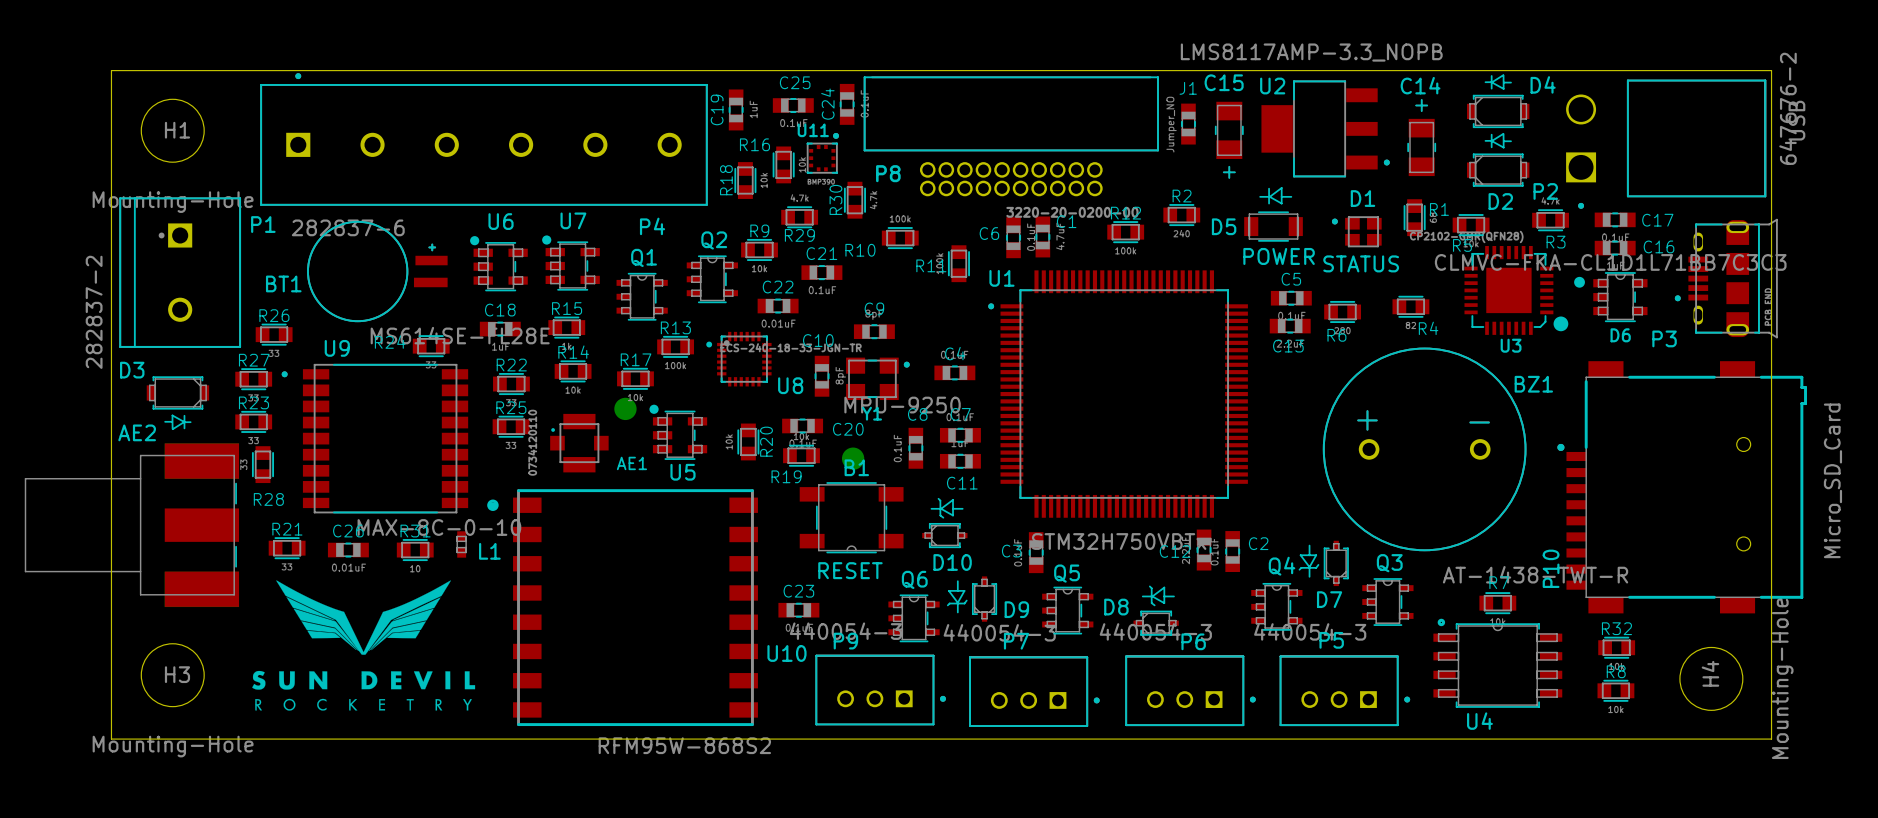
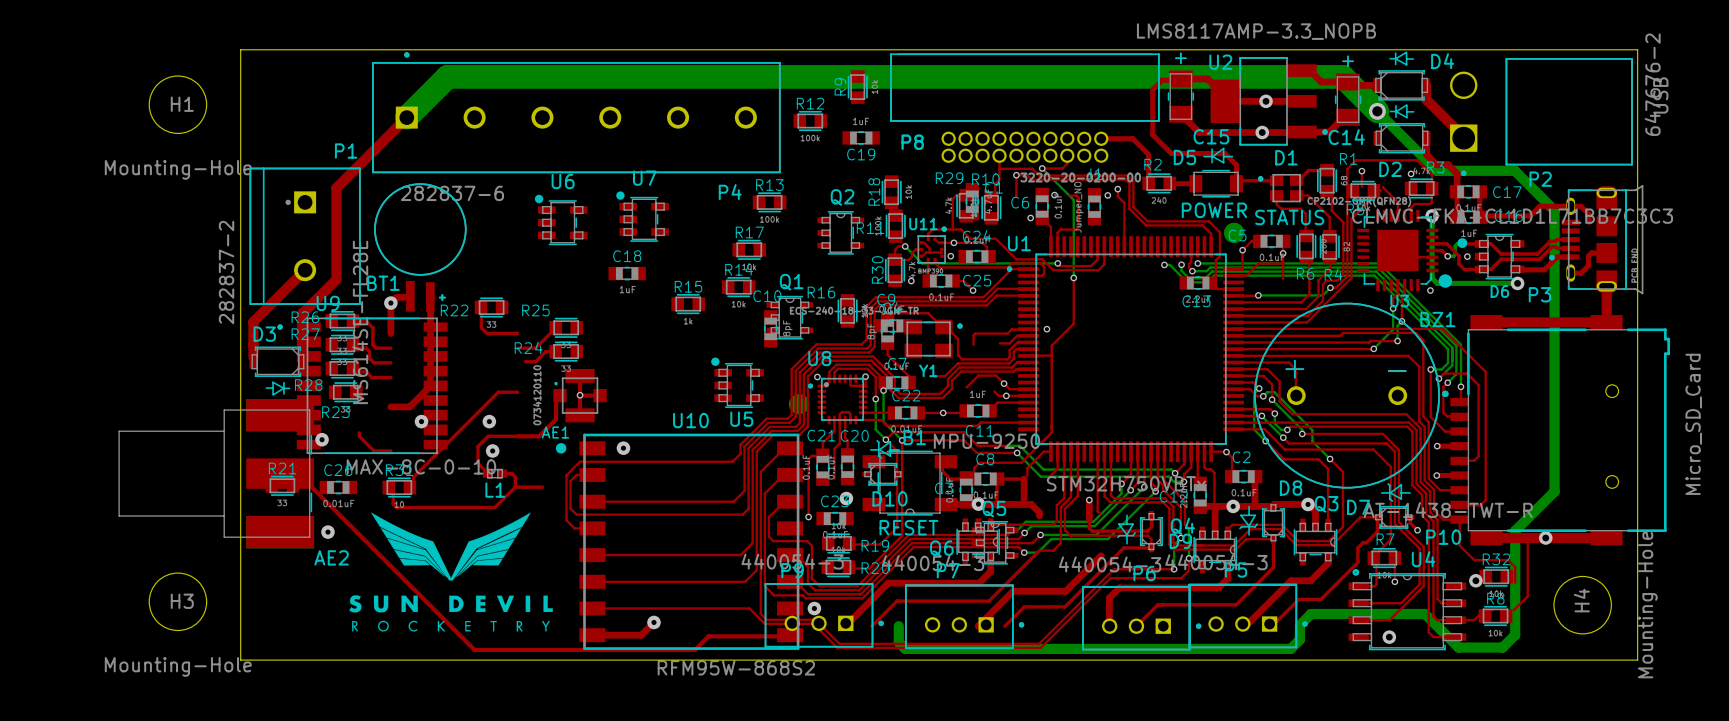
board edge: (241, 70) (111, 70) (111, 739) (241, 739) -> (240, 49) (240, 660)
C25 name position: C25 (795, 82) -> C25 (977, 280)
C14 name position: C14 (1420, 85) -> C14 (1346, 137)
top track: none -> (1312, 72) (1321, 82) (1348, 82)
D4 position: (1498, 101) -> (1401, 76)
top track: none -> (1180, 78) (1207, 78) (1216, 87)
C24 rotation: 0° (847, 104) -> 90° clockwise (977, 256)
C24 position: (847, 104) -> (977, 256)
top track: none -> (1175, 80) (1162, 80) (1152, 89) (1152, 134) (1171, 153) (1224, 153) (1236, 165) (1236, 183)
C25 position: (793, 105) -> (941, 281)
C19 rotation: 0° (736, 109) -> 90° clockwise (861, 137)
C19 position: (736, 109) -> (861, 137)
top track: none -> (1351, 85) (1377, 85)
top track: none -> (1426, 85) (1426, 99) (1461, 134)
J1 position: (1188, 124) -> (1094, 206)
top track: none -> (1229, 99) (1231, 101) (1302, 101)
via: none -> (1266, 101)
U2 position: (1325, 128) -> (1269, 101)
P8 position: (1011, 136) -> (1024, 108)
C14 position: (1421, 137) -> (1348, 90)
via: none -> (1377, 111)
P4 position: (483, 139) -> (576, 112)
C15 rotation: 0° (1229, 140) -> 180° (1180, 87)
C15 position: (1229, 140) -> (1180, 87)
top track: none -> (1180, 114) (1199, 132) (1296, 132)
bottom track: none -> (406, 117) (447, 76) (1342, 76) (1436, 170) (1514, 170) (1554, 210) (1554, 491) (1515, 530) (1515, 635) (1502, 647) (1458, 647) (1425, 613) (1311, 613) (1300, 624)
top track: none -> (403, 120) (336, 187) (336, 279) (302, 313) (302, 360)
top track: none -> (1338, 122) (1329, 132) (1302, 132)
U11 position: (822, 153) -> (932, 245)
D2 position: (1498, 159) -> (1401, 128)
via: none -> (1262, 132)
R16 position: (783, 164) -> (847, 310)
top track: none -> (1101, 138) (1132, 138) (1148, 154) (1148, 183)
top track: none -> (1427, 139) (1426, 154) (1436, 164) (1448, 164) (1457, 173) (1457, 214)
R18 position: (745, 180) -> (891, 192)
top track: none -> (999, 155) (999, 179) (995, 184) (995, 193)
top track: none -> (1067, 155) (1067, 163) (1062, 168) (1042, 168)
P2 name position: P2 (1545, 191) -> P2 (1540, 179)
R2 name position: R2 (1182, 196) -> R2 (1153, 164)
R30 position: (854, 200) -> (895, 270)
top track: none -> (999, 168) (1032, 168) (1039, 175) (1127, 175) (1133, 181) (1133, 207) (1147, 221) (1209, 221) (1219, 232) (1219, 256) (1215, 260) (1215, 287) (1233, 289)
bottom track: none -> (1042, 168) (1073, 199) (1073, 277)
via: none -> (1042, 168)
top track: none -> (1328, 170) (1308, 170) (1296, 180)
top track: none -> (1361, 171) (1361, 186)
via: none -> (1361, 171)
via: none -> (1411, 173)
via: none -> (1016, 175)
R1 name position: R1 (1439, 209) -> R1 (1348, 158)
D5 position: (1273, 214) -> (1216, 172)
top track: none -> (1237, 180) (1276, 180)
R2 position: (1181, 215) -> (1159, 183)
top track: none -> (1170, 182) (1195, 183)
R29 rotation: 0° (799, 217) -> 90° clockwise (966, 205)
R29 position: (799, 217) -> (966, 205)
R1 position: (1414, 217) -> (1327, 180)
C17 position: (1615, 219) -> (1468, 191)
top track: none -> (1383, 186) (1397, 202) (1397, 213)
R3 position: (1550, 220) -> (1421, 188)
top track: none -> (1432, 188) (1432, 175) (1417, 160) (1356, 160) (1347, 169) (1347, 276) (1335, 287) (1330, 287)
top track: none -> (1117, 189) (1117, 196) (1124, 202) (1124, 246)
via: none -> (1117, 189)
P1 name position: P1 (263, 224) -> P1 (346, 151)
top track: none -> (1332, 190) (1331, 210) (1343, 222) (1343, 274) (1337, 280) (1326, 280) (1322, 284) (1322, 300) (1307, 315) (1233, 315)
top track: none -> (1380, 190) (1351, 218) (1351, 277) (1306, 322) (1233, 322)
top track: none -> (1431, 190) (1431, 202) (1430, 204) (1414, 204) (1411, 207) (1411, 215)
D5 name position: D5 (1224, 226) -> D5 (1184, 157)
top track: none -> (1479, 191) (1479, 215)
via: none -> (1054, 195)
top track: none -> (962, 195) (956, 195) (952, 198) (952, 229)
top track: none -> (1016, 195) (1016, 175) (1026, 175) (1031, 179) (1125, 179) (1129, 183) (1129, 208) (1145, 225) (1202, 225) (1211, 233) (1211, 246)
top track: none -> (1069, 195) (1076, 195) (1078, 197) (1078, 226) (1075, 229) (1060, 229) (1057, 232) (1057, 246)
via: none -> (1107, 195)
top track: none -> (1276, 195) (1276, 204) (1281, 208) (1300, 208) (1305, 213) (1305, 236)
top track: none -> (1296, 195) (1307, 195) (1329, 217) (1329, 237)
D1 position: (1356, 231) -> (1280, 188)
R12 position: (1125, 232) -> (810, 120)
R29 name position: R29 (799, 235) -> R29 (949, 178)
C6 position: (1013, 237) -> (1042, 206)
R10 rotation: 0° (900, 238) -> 90° clockwise (991, 207)
R10 position: (900, 238) -> (991, 207)
R3 name position: R3 (1556, 242) -> R3 (1435, 167)
C16 position: (1615, 248) -> (1468, 217)
R9 rotation: 0° (759, 249) -> 90° clockwise (857, 87)
R9 position: (759, 249) -> (857, 87)
bottom track: none -> (1432, 215) (1432, 278) (1437, 283) (1517, 283)
via: none -> (1432, 215)
top track: none -> (1482, 215) (1530, 215) (1539, 206) (1580, 206) (1589, 214) (1589, 222)
via: none -> (1030, 218)
text position: POWER (1279, 256) -> POWER (1214, 210)
top track: none -> (1047, 223) (1050, 227) (1050, 246)
U6 position: (498, 263) -> (561, 220)
U7 position: (570, 263) -> (642, 216)
text position: STATUS (1361, 263) -> STATUS (1289, 217)
BT1 rotation: 0° (377, 271) -> 90° clockwise (420, 247)
part: none -> (1234, 232)
P1 position: (180, 272) -> (305, 236)
C21 rotation: 0° (821, 272) -> 90° clockwise (822, 467)
C21 position: (821, 272) -> (822, 467)
top track: none -> (928, 239) (928, 233) (932, 229) (961, 229) (970, 238) (995, 238) (1016, 259) (1042, 259) (1053, 270) (1098, 270) (1104, 264) (1104, 246)
top track: none -> (1570, 239) (1550, 241) (1537, 253) (1501, 253) (1491, 243) (1463, 243)
Q2 position: (712, 279) -> (840, 232)
top track: none -> (936, 240) (938, 242) (982, 242) (986, 247) (986, 253)
C5 name position: C5 (1291, 279) -> C5 (1237, 235)
top track: none -> (1260, 241) (1251, 241) (1242, 250) (1242, 269)
top track: none -> (1283, 241) (1283, 278)
top track: none -> (921, 242) (929, 248) (929, 252)
via: none -> (953, 242)
BT1 name position: BT1 (283, 283) -> BT1 (383, 283)
top track: none -> (1432, 243) (1446, 243) (1458, 255) (1458, 264) (1464, 269) (1481, 269)
bottom track: none -> (1463, 243) (1457, 243) (1455, 246) (1455, 254) (1447, 256)
top track: none -> (905, 246) (898, 246) (895, 249) (895, 263)
bottom track: none -> (905, 246) (922, 263) (1057, 263)
via: none -> (905, 246)
top track: none -> (1097, 246) (1097, 259) (1091, 266) (1060, 266) (1057, 263)
top track: none -> (1191, 246) (1191, 261) (1189, 267) (1192, 271)
top track: none -> (1570, 248) (1552, 246) (1539, 259) (1501, 259) (1491, 269) (1481, 269)
top track: none -> (921, 249) (915, 249) (908, 260) (895, 260)
via: none -> (1242, 250)
top track: none -> (1432, 250) (1441, 250) (1447, 256)
top track: none -> (941, 252) (926, 252) (921, 256)
via: none -> (1283, 253)
top track: none -> (1606, 253) (1591, 253) (1588, 256) (1588, 265) (1580, 273) (1572, 273)
Q1 position: (642, 296) -> (789, 317)
via: none -> (950, 256)
via: none -> (1447, 256)
top track: none -> (1413, 256) (1432, 257)
via: none -> (1467, 256)
top track: none -> (1570, 257) (1557, 257) (1544, 269) (1520, 269)
C5 position: (1291, 298) -> (1271, 241)
top track: none -> (1309, 258) (1309, 294) (1301, 302) (1233, 302)
top track: none -> (1330, 258) (1330, 268) (1318, 280) (1318, 296) (1306, 309) (1233, 309)
top track: none -> (928, 259) (929, 281)
top track: none -> (935, 259) (935, 263) (939, 267) (1007, 267) (1011, 263) (1040, 263) (1044, 266) (1044, 273) (1042, 275) (1028, 275)
via: none -> (1057, 263)
bottom track: none -> (1197, 263) (1379, 263) (1460, 344) (1460, 386)
via: none -> (1197, 263)
top track: none -> (1283, 263) (1258, 263) (1246, 275) (1233, 275)
C22 position: (778, 306) -> (906, 412)
bottom track: none -> (1164, 264) (1169, 264) (1187, 282) (1207, 282) (1214, 275) (1374, 275) (1448, 349) (1448, 363) (1441, 369) (1430, 369)
via: none -> (1164, 264)
bottom track: none -> (1181, 264) (1181, 270) (1189, 278) (1205, 278) (1212, 271) (1376, 271) (1452, 347) (1452, 365) (1438, 378)
via: none -> (1181, 264)
R4 rotation: 0° (1410, 306) -> 90° clockwise (1329, 246)
R4 position: (1410, 306) -> (1329, 246)
top track: none -> (1028, 269) (1011, 269) (983, 297) (875, 297) (866, 306) (866, 339) (861, 344) (816, 344) (791, 369) (791, 414) (787, 418) (766, 418) (740, 444) (740, 453) (732, 461) (580, 461) (566, 475) (566, 520) (574, 528) (592, 528)
top track: none -> (305, 270) (253, 321) (253, 357)
R6 rotation: 0° (1342, 311) -> 90° clockwise (1306, 246)
R6 position: (1342, 311) -> (1306, 246)
bottom track: none -> (1192, 271) (1206, 271) (1210, 267) (1377, 267) (1456, 345) (1456, 374) (1447, 382)
via: none -> (1192, 271)
R26 name position: R26 (274, 315) -> R26 (305, 317)
top track: none -> (1073, 277) (1073, 323) (1051, 345) (1051, 432) (1021, 462) (979, 462) (974, 468) (974, 479) (950, 479) (942, 470) (942, 462)
via: none -> (1073, 277)
via: none -> (911, 281)
top track: none -> (952, 281) (963, 281) (973, 290)
via: none -> (1517, 283)
R15 position: (566, 327) -> (688, 304)
top track: none -> (1397, 285) (1397, 293) (1393, 298) (1393, 308)
top track: none -> (1404, 285) (1404, 295) (1401, 298) (1401, 321)
C18 position: (500, 329) -> (627, 273)
top track: none -> (1606, 286) (1606, 322) (1604, 324)
C9 rotation: 0° (874, 331) -> 90° clockwise (887, 331)
C9 position: (874, 331) -> (887, 331)
bottom track: none -> (1330, 287) (1322, 295) (1258, 295)
via: none -> (1330, 287)
top track: none -> (1023, 288) (997, 288) (985, 301) (877, 301) (870, 308) (870, 345) (867, 348) (818, 348) (795, 370) (795, 416) (789, 422) (768, 422) (744, 446) (744, 490) (733, 501) (592, 501)
R26 position: (274, 334) -> (342, 321)
via: none -> (973, 290)
via: none -> (1430, 290)
top track: none -> (1024, 295) (996, 295) (986, 305) (879, 305) (874, 309) (874, 346) (868, 352) (819, 352) (799, 372) (799, 423) (796, 426) (769, 426) (748, 448) (748, 508) (742, 514) (576, 514) (570, 508) (570, 481) (576, 475) (592, 475)
top track: none -> (1258, 295) (1233, 295)
via: none -> (1258, 295)
top track: none -> (410, 297) (396, 297) (390, 303) (390, 333)
top track: none -> (430, 297) (430, 386) (409, 406) (390, 406)
R24 position: (431, 346) -> (566, 351)
R13 position: (675, 346) -> (769, 202)
via: none -> (390, 303)
bottom track: none -> (1393, 308) (1393, 329) (1373, 348)
via: none -> (1393, 308)
top track: none -> (481, 310) (481, 327) (487, 333) (517, 333)
U8 position: (738, 359) -> (837, 399)
R27 name position: R27 (254, 360) -> R27 (305, 334)
R22 name position: R22 (511, 365) -> R22 (454, 310)
top track: none -> (887, 319) (894, 313) (928, 313) (958, 339) (958, 355) (962, 359) (1007, 359) (1009, 357) (1009, 350) (1017, 342) (1028, 342)
top track: none -> (355, 321) (366, 321) (372, 327) (372, 344) (376, 348) (390, 348)
bottom track: none -> (1401, 321) (1397, 325) (1397, 341)
via: none -> (1401, 321)
top track: none -> (1606, 322) (1486, 322)
D3 name position: D3 (132, 370) -> D3 (264, 334)
R14 position: (573, 371) -> (738, 287)
top track: none -> (1020, 329) (1011, 329) (1007, 333) (975, 333) (973, 335) (973, 344)
via: none -> (1046, 329)
top track: none -> (1442, 328) (1485, 371) (1485, 500) (1480, 505) (1464, 505)
top track: none -> (1442, 328) (1233, 329)
top track: none -> (552, 331) (535, 348) (517, 348)
R17 position: (635, 378) -> (749, 249)
Y1 position: (877, 378) -> (933, 339)
R27 position: (253, 379) -> (342, 344)
top track: none -> (1028, 335) (1017, 335) (1009, 343) (999, 343)
top track: none -> (1233, 335) (1340, 335) (1343, 332) (1415, 332) (1423, 340) (1423, 416) (1428, 422) (1428, 478) (1440, 490) (1459, 490)
R22 position: (511, 384) -> (491, 307)
BZ1 name position: BZ1 (1533, 384) -> BZ1 (1437, 319)
U8 name position: U8 (790, 385) -> U8 (819, 358)
top track: none -> (1397, 341) (1233, 342)
via: none -> (1397, 341)
top track: none -> (887, 342) (887, 354) (909, 376)
U1 position: (1118, 394) -> (1125, 349)
top track: none -> (355, 348) (366, 348) (369, 351) (369, 358) (374, 362) (390, 362)
top track: none -> (1028, 349) (1016, 349) (1013, 351) (1013, 359) (1009, 363) (957, 363) (944, 376) (934, 376)
top track: none -> (1373, 348) (1233, 349)
via: none -> (1373, 348)
top track: none -> (555, 351) (545, 351) (535, 361) (525, 361)
R23 name position: R23 (253, 402) -> R23 (335, 412)
D3 position: (177, 403) -> (277, 371)
top track: none -> (1051, 354) (1032, 355)
top track: none -> (1233, 355) (1408, 355) (1419, 366) (1419, 421) (1424, 426) (1424, 480) (1434, 489) (1434, 510) (1443, 519) (1459, 519) (1459, 545) (1474, 560) (1508, 560) (1515, 567) (1515, 582)
R25 name position: R25 (511, 407) -> R25 (535, 310)
part: (625, 408) -> none
top track: none -> (879, 362) (873, 356) (821, 356) (803, 374) (803, 424) (797, 430) (771, 430) (752, 449) (752, 543) (740, 554) (594, 554)
top track: none -> (1028, 362) (1017, 362) (1012, 367) (959, 367) (947, 379) (947, 386) (940, 393) (900, 393) (894, 388) (894, 378) (879, 363)
top track: none -> (1233, 362) (1288, 362) (1295, 369) (1295, 394)
top track: none -> (1028, 369) (1016, 369) (1013, 371) (961, 371) (952, 380) (952, 388) (942, 398) (898, 398) (890, 389) (890, 379) (871, 360) (823, 360) (807, 376) (807, 426) (799, 434) (773, 434) (756, 451) (756, 570) (745, 581) (592, 581)
top track: none -> (1233, 369) (1267, 369) (1279, 381) (1279, 401) (1292, 414) (1406, 414) (1420, 428) (1420, 482) (1430, 491) (1430, 512) (1437, 519) (1437, 599) (1441, 603) (1456, 603)
top track: none -> (1430, 369) (1430, 416) (1445, 431) (1455, 431)
via: none -> (1430, 369)
R23 position: (253, 421) -> (345, 392)
top track: none -> (352, 371) (366, 371) (371, 377) (390, 377)
R25 position: (511, 426) -> (566, 327)
C20 rotation: 0° (802, 426) -> 90° clockwise (847, 466)
C20 position: (802, 426) -> (847, 466)
top track: none -> (580, 375) (581, 414)
top track: none -> (1233, 375) (1263, 375) (1272, 384) (1272, 399)
via: none -> (817, 376)
top track: none -> (865, 376) (865, 385)
via: none -> (865, 376)
C20 name position: C20 (848, 429) -> C20 (854, 435)
top track: none -> (829, 378) (829, 372) (836, 364) (869, 364) (883, 379) (883, 390)
top track: none -> (834, 378) (834, 372) (838, 368) (867, 368) (875, 377) (875, 399)
top track: none -> (850, 378) (851, 385) (860, 385)
top track: none -> (1438, 378) (1444, 373) (1467, 373) (1478, 385) (1478, 456) (1474, 460) (1467, 460)
via: none -> (1438, 378)
AE2 name position: AE2 (137, 432) -> AE2 (331, 557)
U5 position: (678, 432) -> (737, 382)
top track: none -> (1233, 382) (1253, 382) (1259, 388)
top track: none -> (1447, 382) (1443, 387) (1443, 412) (1447, 416) (1453, 416)
via: none -> (1447, 382)
via: none -> (1004, 383)
top track: none -> (1460, 386) (1461, 402)
via: none -> (1460, 386)
top track: none -> (966, 387) (978, 375) (996, 375) (1009, 389) (1028, 389)
R20 rotation: 0° (748, 441) -> 90° clockwise (838, 567)
R20 position: (748, 441) -> (838, 567)
bottom track: none -> (1259, 388) (1254, 393) (1254, 429) (1265, 441)
via: none -> (1259, 388)
top track: none -> (1233, 389) (1250, 389) (1257, 396) (1263, 396)
AE1 position: (579, 443) -> (580, 395)
bottom track: none -> (883, 390) (883, 421) (902, 440)
via: none -> (883, 390)
top track: none -> (994, 391) (998, 395) (1028, 395)
top track: none -> (517, 392) (498, 392) (413, 477) (413, 490)
via: none -> (580, 395)
C8 rotation: 0° (915, 448) -> 90° clockwise (985, 479)
C8 position: (915, 448) -> (985, 479)
top track: none -> (600, 395) (580, 396)
via: none -> (1006, 395)
BZ1 position: (1424, 449) -> (1347, 395)
bottom track: none -> (1263, 396) (1267, 392) (1274, 392) (1312, 430) (1312, 441) (1330, 459)
via: none -> (1263, 396)
top track: none -> (556, 399) (556, 419) (539, 436) (488, 436) (478, 446) (478, 463) (487, 473)
bottom track: none -> (875, 399) (875, 429) (885, 439)
via: none -> (875, 399)
bottom track: none -> (1272, 399) (1302, 429) (1302, 433)
via: none -> (1272, 399)
R19 position: (801, 455) -> (838, 543)
top track: none -> (1028, 402) (997, 402) (992, 407)
C11 position: (960, 461) -> (978, 410)
AE1 name position: AE1 (631, 463) -> AE1 (555, 432)
R28 rotation: 0° (262, 464) -> 90° clockwise (342, 368)
R28 position: (262, 464) -> (342, 368)
top track: none -> (1233, 409) (1270, 409) (1274, 413)
top track: none -> (863, 412) (893, 412)
top track: none -> (917, 412) (963, 412)
via: none -> (943, 412)
bottom track: none -> (1274, 413) (1274, 423) (1281, 429) (1287, 429)
via: none -> (1274, 413)
top track: none -> (1233, 415) (1261, 415)
bottom track: none -> (1261, 415) (1283, 437)
via: none -> (1261, 415)
top track: none -> (850, 419) (848, 412) (841, 412) (839, 414) (839, 443) (834, 448) (834, 478)
R19 name position: R19 (786, 476) -> R19 (875, 545)
top track: none -> (834, 420) (834, 431) (822, 442) (822, 455) (811, 455) (808, 459) (808, 517)
top track: none -> (855, 419) (881, 419) (887, 425) (977, 425) (980, 422) (1028, 422)
via: none -> (421, 421)
via: none -> (489, 421)
top track: none -> (845, 422) (847, 455)
top track: none -> (1233, 422) (1408, 422) (1416, 430) (1416, 483) (1426, 493) (1426, 513) (1433, 521) (1433, 616) (1437, 620) (1456, 620)
top track: none -> (1233, 429) (1264, 429) (1284, 449) (1373, 449) (1390, 466) (1390, 539) (1375, 554)
top track: none -> (1287, 429) (1290, 426) (1407, 426) (1412, 431) (1412, 485) (1421, 494) (1421, 515) (1428, 522) (1428, 632) (1433, 637) (1456, 637)
via: none -> (1287, 429)
top track: none -> (359, 432) (359, 436) (374, 450) (390, 450)
top track: none -> (1302, 433) (1382, 433) (1398, 449) (1398, 522) (1423, 546) (1423, 586) (1389, 620) (1358, 620)
via: none -> (1302, 433)
top track: none -> (1283, 437) (1289, 443) (1386, 443) (1394, 451) (1394, 523) (1419, 548) (1419, 584) (1400, 603) (1358, 603)
via: none -> (1283, 437)
via: none -> (322, 439)
via: none -> (885, 439)
via: none -> (902, 440)
top track: none -> (1265, 441) (1283, 459) (1318, 459) (1328, 468) (1328, 521)
via: none -> (1265, 441)
top track: none -> (1007, 445) (977, 445) (964, 432) (893, 432) (885, 439) (897, 450) (897, 527) (880, 544) (848, 544)
bottom track: none -> (1007, 445) (1019, 445) (1043, 469) (1171, 469) (1175, 473)
top track: none -> (1437, 446) (1459, 446)
via: none -> (1437, 446)
via: none -> (623, 448)
top track: none -> (790, 448) (784, 448) (760, 471) (760, 613) (766, 619) (815, 619) (839, 643) (1039, 643) (1113, 569) (1174, 569)
via: none -> (492, 450)
top track: none -> (1050, 451) (1043, 451) (1027, 468) (1027, 475)
top track: none -> (1057, 451) (1057, 468) (1050, 475)
top track: none -> (1070, 451) (1070, 497) (1060, 507) (1060, 543) (1053, 550) (1040, 550)
top track: none -> (1097, 451) (1097, 511) (1100, 514)
top track: none -> (1111, 451) (1111, 495) (1114, 498) (1164, 498) (1173, 506) (1173, 543) (1175, 545) (1202, 545)
top track: none -> (1131, 451) (1131, 474) (1121, 483)
top track: none -> (1137, 451) (1137, 483) (1130, 490)
top track: none -> (1144, 451) (1144, 487)
top track: none -> (1151, 451) (1151, 482) (1155, 487) (1155, 491)
top track: none -> (1157, 451) (1157, 479) (1162, 485) (1162, 489) (1180, 507) (1180, 538)
top track: none -> (1164, 451) (1164, 480) (1184, 501) (1184, 524) (1189, 528)
top track: none -> (1184, 451) (1184, 463) (1175, 473)
top track: none -> (1191, 451) (1191, 467) (1183, 474) (1183, 481)
top track: none -> (1197, 451) (1197, 480)
top track: none -> (1204, 451) (1204, 467) (1214, 472) (1215, 508)
top track: none -> (1211, 451) (1226, 451) (1232, 457) (1232, 476)
via: none -> (1226, 452)
top track: none -> (1017, 452) (976, 452) (964, 440) (902, 440) (902, 535) (869, 568) (849, 568)
bottom track: none -> (1017, 452) (1040, 476) (1168, 476) (1173, 481) (1183, 481)
via: none -> (1017, 452)
top track: none -> (1104, 455) (1104, 496) (1110, 502) (1163, 502) (1169, 508) (1169, 544) (1174, 549) (1235, 549) (1246, 539) (1273, 539) (1273, 567) (1236, 604) (1157, 604) (1136, 626)
top track: none -> (1064, 457) (1064, 498) (1056, 505) (1056, 521) (1053, 524) (990, 524)
B1 position: (851, 517) -> (909, 483)
top track: none -> (1077, 457) (1077, 495) (1064, 508) (1064, 530) (1070, 535) (1148, 535) (1151, 539) (1151, 547) (1123, 547) (1064, 606) (1024, 606) (1004, 626)
top track: none -> (1330, 459) (1342, 471) (1342, 526) (1328, 541) (1298, 541) (1281, 524) (1232, 524) (1228, 529)
via: none -> (1330, 459)
AE2 position: (131, 525) -> (216, 473)
top track: none -> (280, 473) (298, 473) (474, 649) (695, 649) (708, 636) (793, 636)
top track: none -> (502, 473) (511, 473) (515, 477) (515, 487)
via: none -> (1175, 473)
top track: none -> (790, 475) (783, 475) (764, 493) (764, 586) (774, 595) (802, 595) (805, 598) (862, 598) (913, 547) (1018, 547) (1024, 552)
top track: none -> (1436, 475) (1459, 475)
via: none -> (1436, 475)
top track: none -> (1254, 476) (1254, 506)
top track: none -> (1024, 479) (1023, 504)
top track: none -> (1025, 479) (996, 479) (998, 504)
C2 name position: C2 (1258, 543) -> C2 (1241, 457)
via: none -> (1183, 481)
L1 rotation: 0° (461, 544) -> 90° counterclockwise (494, 473)
L1 position: (461, 544) -> (494, 473)
bottom track: none -> (1121, 483) (1121, 493) (1093, 521) (1025, 521) (1016, 531) (1011, 531)
via: none -> (1121, 483)
top track: none -> (515, 487) (542, 487)
top track: none -> (515, 487) (494, 507) (396, 507) (393, 504) (393, 493)
bottom track: none -> (1144, 487) (1096, 534) (1040, 534)
via: none -> (1144, 487)
C12 position: (1204, 550) -> (1200, 495)
L1 name position: L1 (489, 551) -> L1 (495, 490)
C2 rotation: 0° (1232, 551) -> 90° clockwise (1243, 476)
C2 position: (1232, 551) -> (1243, 476)
bottom track: none -> (1130, 490) (1094, 526) (1031, 526) (1024, 532)
via: none -> (1130, 490)
bottom track: none -> (1155, 491) (1107, 539) (1051, 539) (1037, 552) (1024, 552)
via: none -> (1155, 491)
via: none -> (846, 498)
top track: none -> (1089, 500) (1089, 528) (1092, 531) (1147, 531) (1151, 526) (1151, 514)
via: none -> (1089, 500)
D7 rotation: 0° (1323, 563) -> 90° clockwise (1393, 505)
D7 position: (1323, 563) -> (1393, 505)
top track: none -> (790, 501) (784, 501) (768, 517) (768, 536) (773, 541) (807, 541) (811, 545) (811, 578) (819, 586) (857, 586) (908, 534) (1007, 534) (1011, 531)
Q4 name position: Q4 (1282, 566) -> Q4 (1182, 526)
top track: none -> (946, 503) (1031, 504) (1039, 512) (1039, 516)
via: none -> (978, 504)
top track: none -> (1273, 504) (1308, 504) (1315, 511) (1315, 525)
via: none -> (1308, 504)
P10 name rotation: 0° (1551, 568) -> 90° clockwise (1443, 537)
text position: RESET (850, 570) -> RESET (908, 527)
top track: none -> (1201, 506) (1273, 506)
via: none -> (1233, 506)
top track: none -> (1215, 508) (1215, 532)
Q6 name position: Q6 (914, 579) -> Q6 (941, 548)
via: none -> (808, 517)
top track: none -> (1410, 517) (1410, 522) (1417, 530)
bottom track: none -> (1189, 528) (1189, 558)
via: none -> (1417, 530)
via: none -> (327, 532)
D9 position: (972, 599) -> (1139, 531)
top track: none -> (1024, 532) (1018, 539) (910, 539) (859, 590) (815, 590) (807, 583) (807, 566) (796, 555) (790, 555)
via: none -> (1024, 532)
top track: none -> (1040, 534) (1032, 543) (912, 543) (860, 594) (808, 594) (800, 586)
via: none -> (1040, 534)
Q3 rotation: 0° (1387, 602) -> 90° clockwise (1315, 542)
Q3 position: (1387, 602) -> (1315, 542)
R7 position: (1497, 603) -> (1384, 558)
top track: none -> (1601, 536) (1486, 538)
bottom track: none -> (1180, 538) (1174, 544) (1174, 569)
via: none -> (1180, 538)
top track: none -> (1529, 538) (1527, 540) (1527, 596) (1513, 610)
via: none -> (1545, 538)
Q4 rotation: 0° (1276, 606) -> 90° clockwise (1215, 549)
Q4 position: (1276, 606) -> (1215, 549)
U10 position: (622, 607) -> (679, 541)
D8 name position: D8 (1116, 607) -> D8 (1291, 488)
C23 position: (798, 610) -> (835, 518)
D8 rotation: 0° (1156, 610) -> 90° counterclockwise (1262, 522)
D8 position: (1156, 610) -> (1262, 522)
top track: none -> (1196, 545) (1234, 545) (1250, 529) (1280, 529) (1296, 545) (1332, 545) (1360, 517) (1377, 517) (1377, 531) (1357, 547) (1357, 562) (1320, 599) (1298, 599) (1272, 625)
Q6 rotation: 0° (914, 618) -> 90° clockwise (978, 541)
Q6 position: (914, 618) -> (978, 541)
top track: none -> (1038, 551) (988, 601) (897, 601) (872, 626)
via: none -> (1024, 552)
top track: none -> (1101, 555) (1065, 591) (1013, 591) (978, 626)
top track: none -> (1189, 558) (1189, 570) (1181, 578) (1110, 578) (1040, 647) (837, 647) (813, 623) (764, 623) (749, 608) (592, 608)
via: none -> (1189, 558)
top track: none -> (1394, 558) (1394, 581)
top track: none -> (990, 559) (990, 571) (979, 583) (888, 583) (845, 626)
top track: none -> (1328, 559) (1328, 563) (1310, 580) (1291, 580) (1246, 625)
top track: none -> (1376, 561) (1376, 584) (1374, 586) (1358, 586)
top track: none -> (1227, 566) (1227, 578) (1218, 587) (1119, 587) (1109, 598) (1109, 621)
via: none -> (1174, 569)
drawing position: (363, 645) -> (451, 572)
via: none -> (1475, 580)
U10 name position: U10 (786, 653) -> U10 (690, 420)
via: none -> (1394, 581)
U4 position: (1497, 663) -> (1407, 609)
via: none -> (814, 608)
top track: none -> (1492, 610) (1484, 610) (1474, 620) (1457, 620)
P6 position: (1190, 690) -> (1141, 618)
top track: none -> (653, 622) (641, 635) (592, 635)
via: none -> (653, 622)
bottom track: none -> (1299, 625) (1299, 639) (1290, 648) (905, 648) (898, 642) (898, 626)
via: none -> (1389, 637)
U4 name position: U4 (1479, 721) -> U4 (1423, 559)

